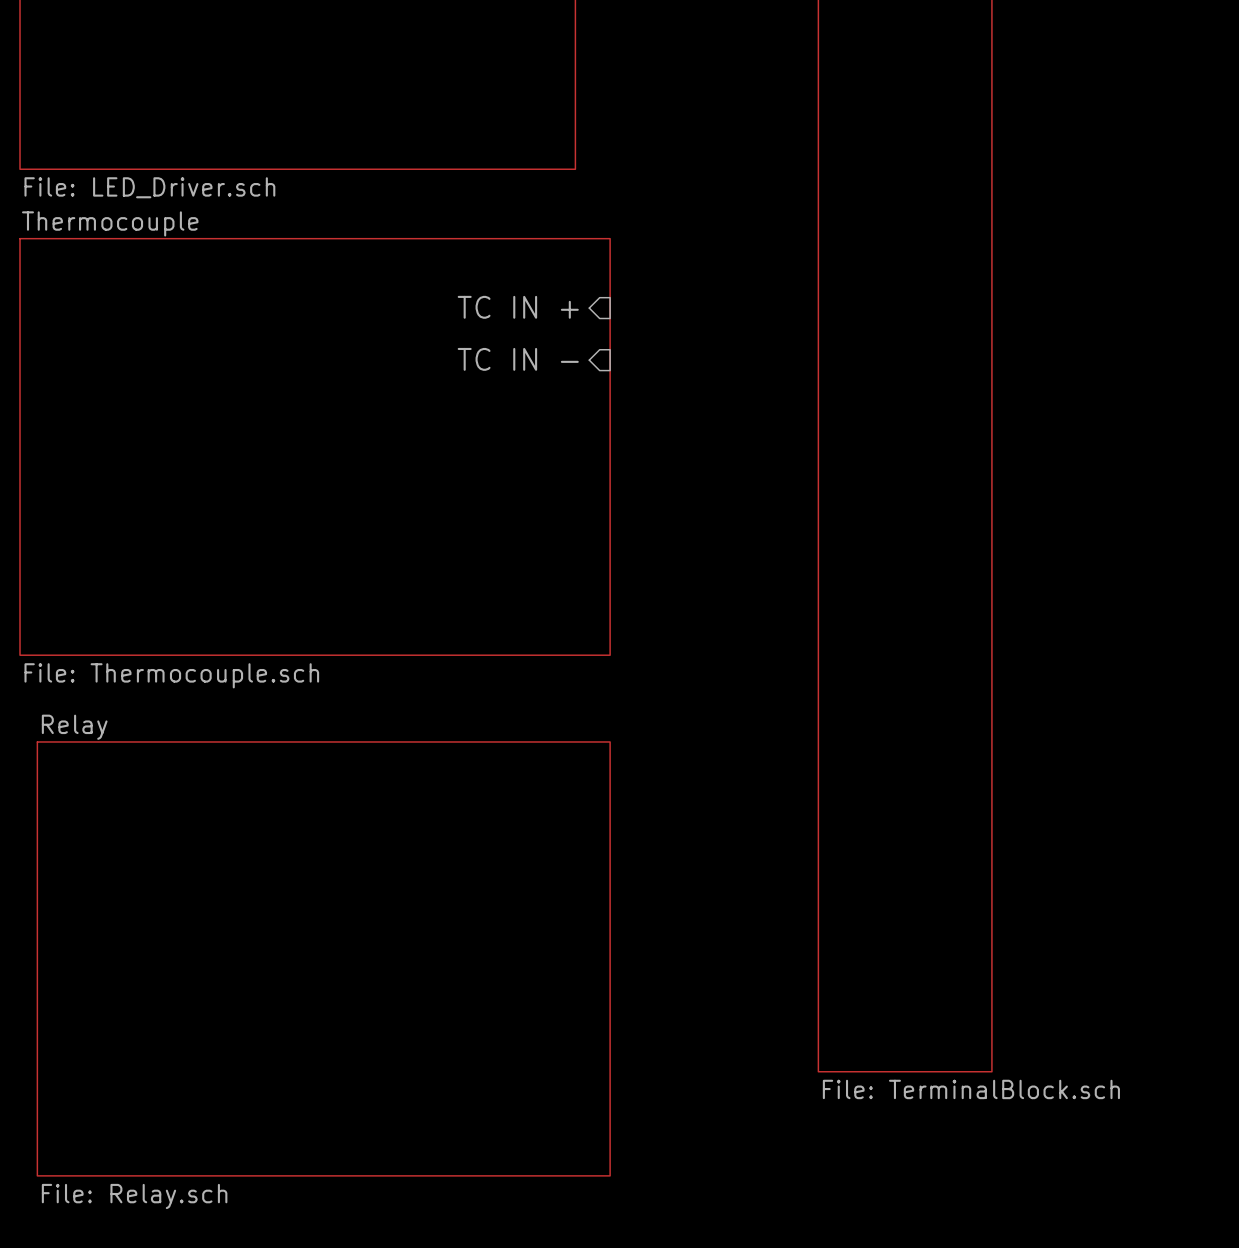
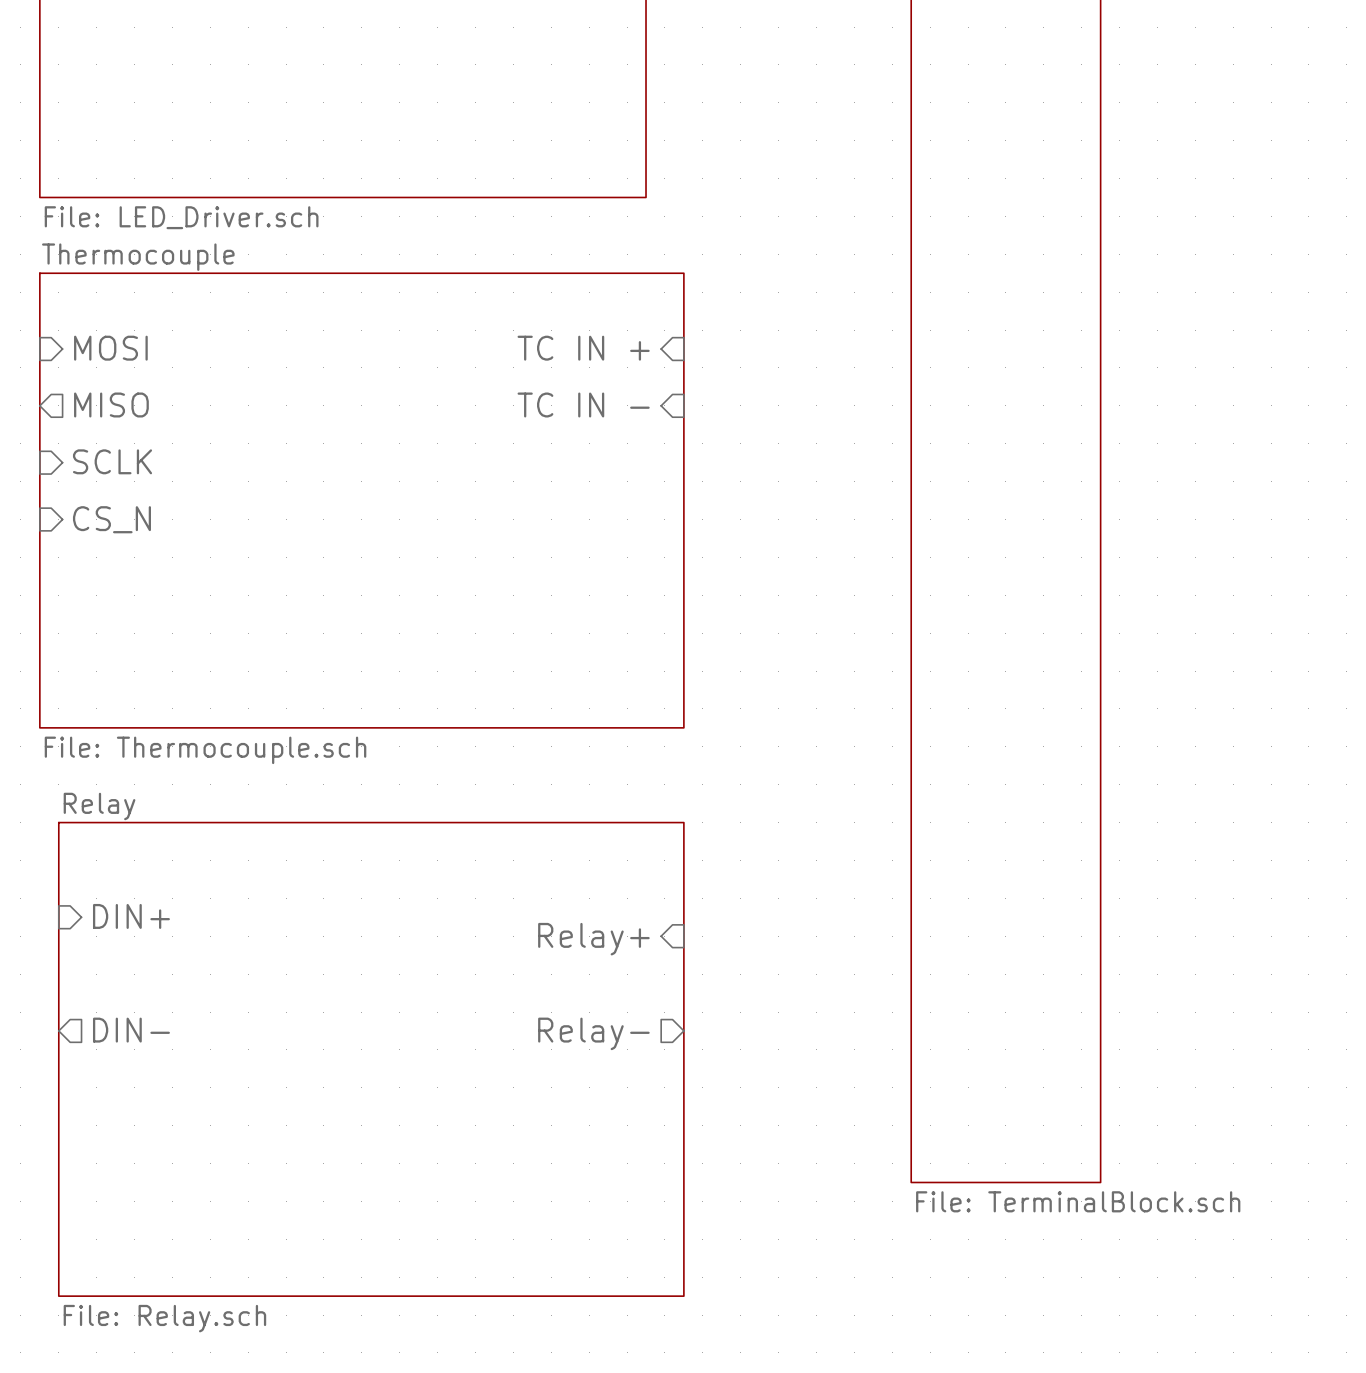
sheet pin: none -> MOSI (110, 348)
sheet pin: none -> MISO (111, 405)
sheet pin: none -> SCLK (112, 461)
sheet pin: none -> CS_N (111, 519)
sheet pin: none -> DIN+ (131, 916)
sheet pin: none -> Relay+ (593, 939)
sheet pin: none -> DIN- (131, 1030)
sheet pin: none -> Relay- (593, 1033)

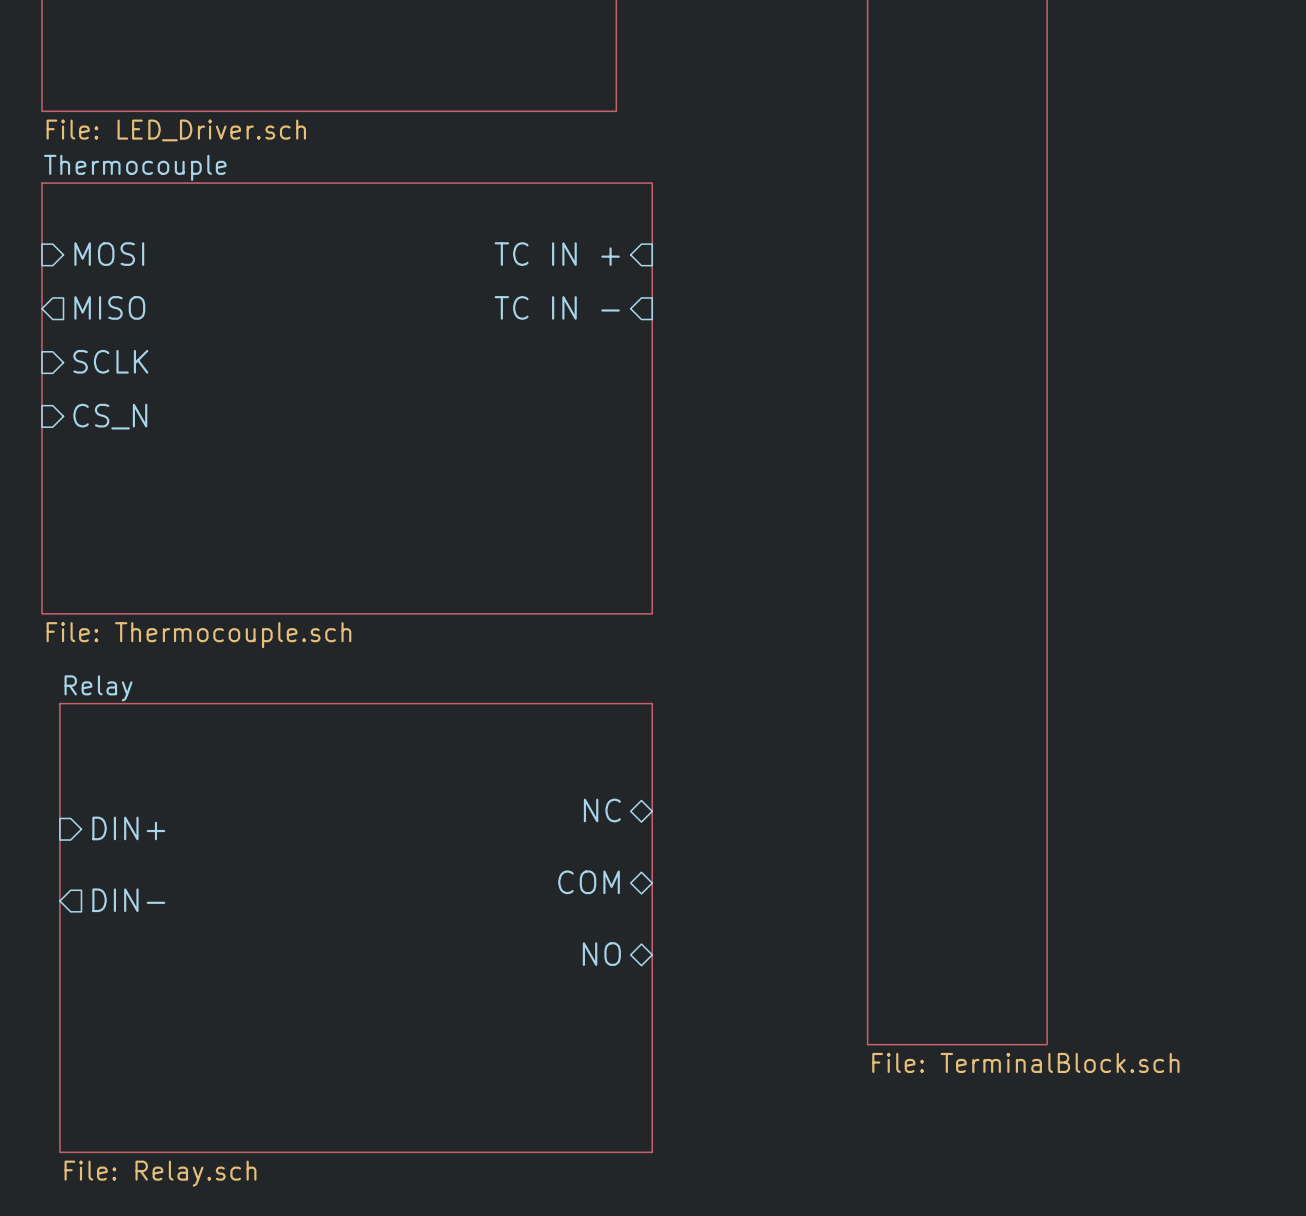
sheet pin position: DIN+ (131, 916) -> DIN+ (128, 828)
sheet pin shape: input (593, 939) -> bidirectional (602, 810)
sheet pin: Relay+ (593, 939) -> NC (602, 810)
sheet pin: none -> COM (589, 882)
sheet pin: Relay- (593, 1033) -> none
sheet pin: none -> NO (601, 954)

